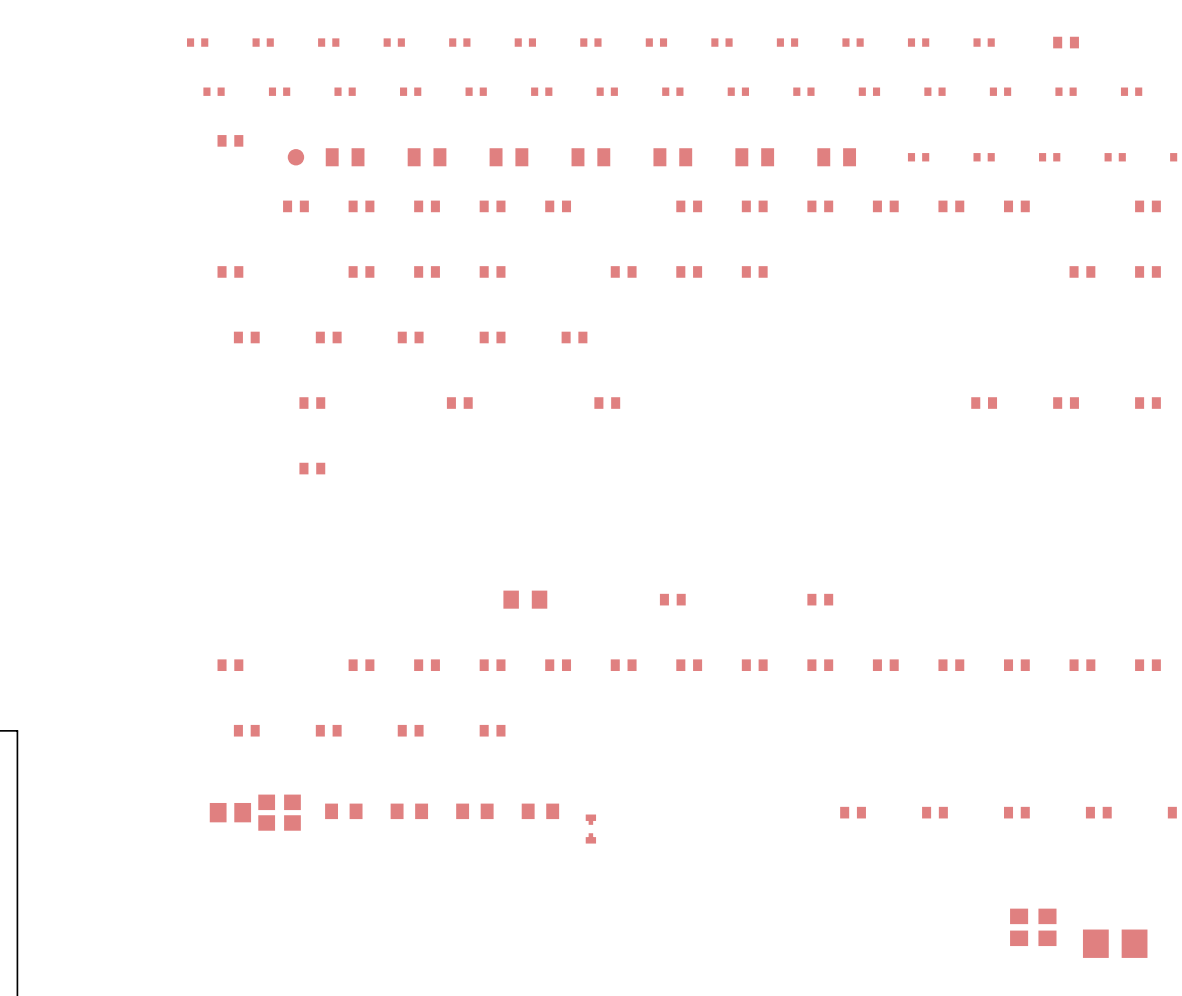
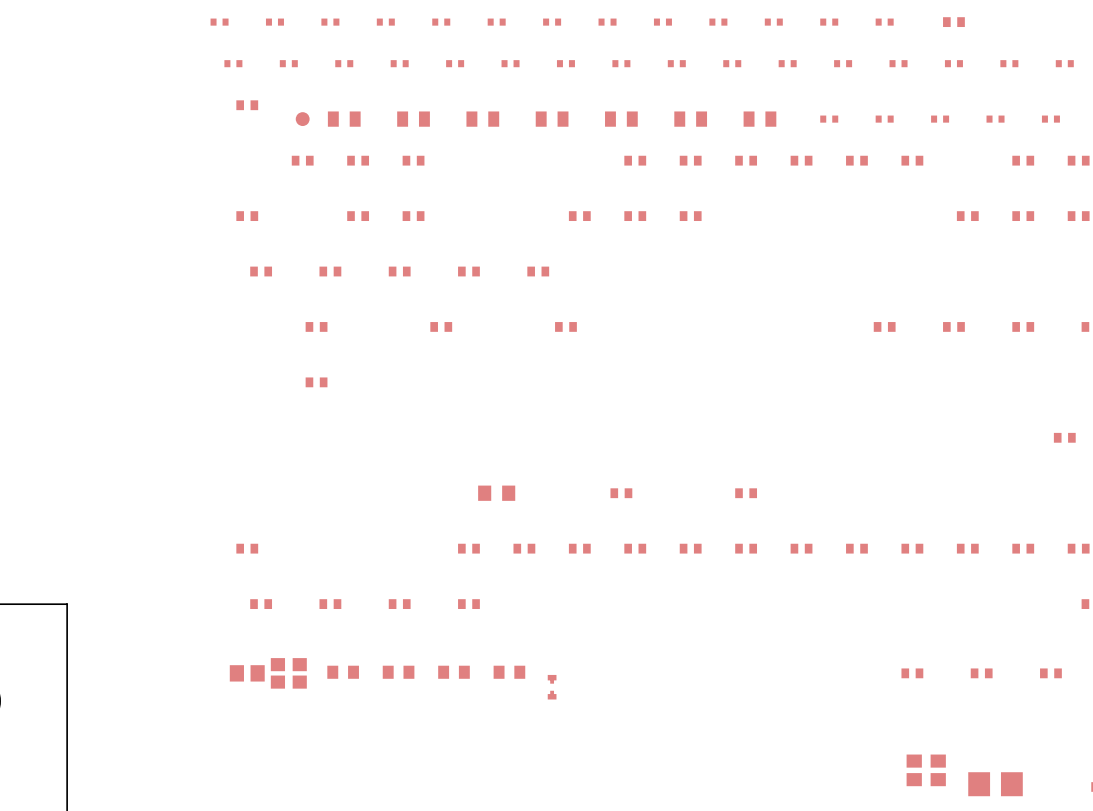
part: (492, 206) -> none
part: (558, 206) -> none
part: (492, 271) -> none
part: (361, 665) -> none
part: (427, 665) -> none
part: (853, 812) -> none
part: (934, 812) -> none

